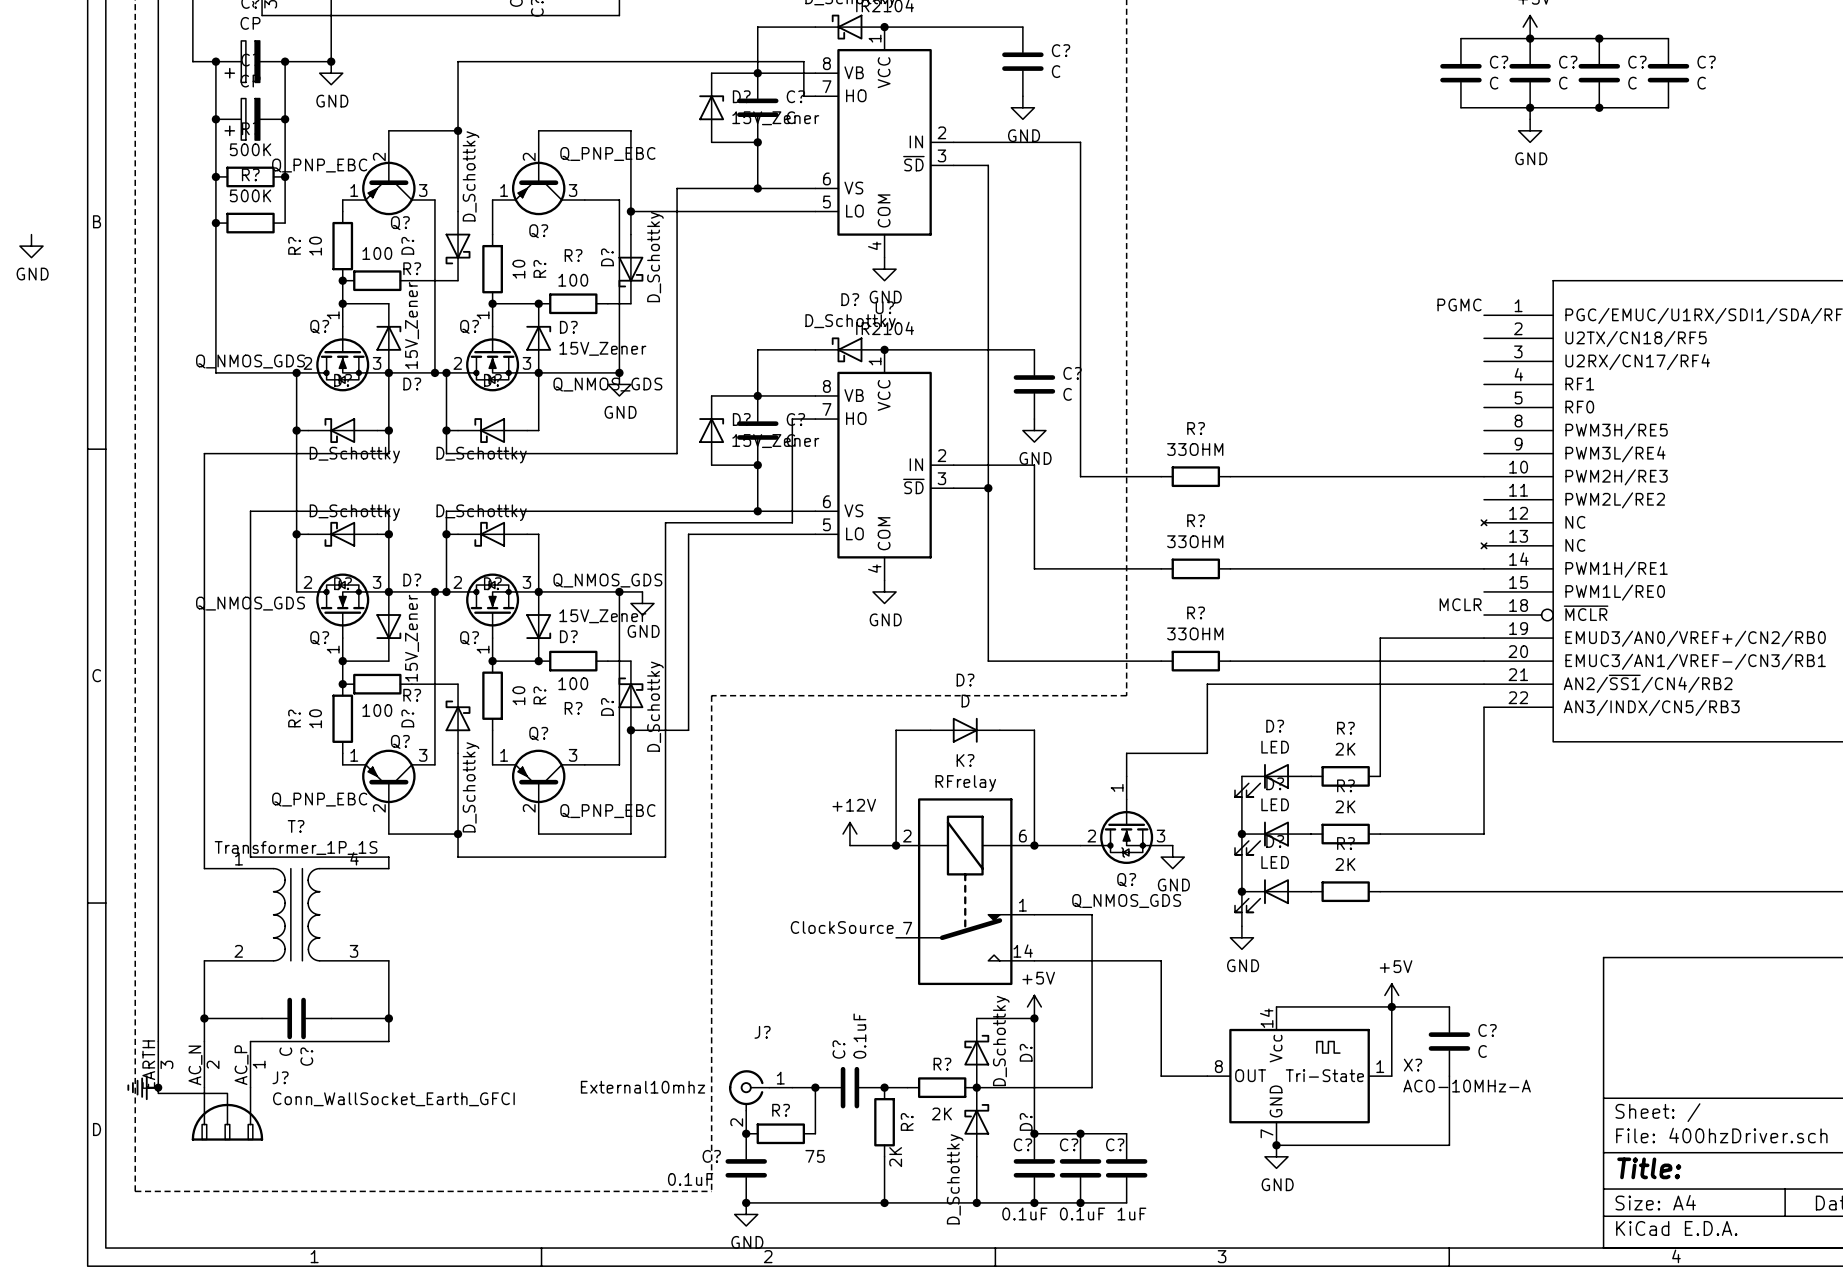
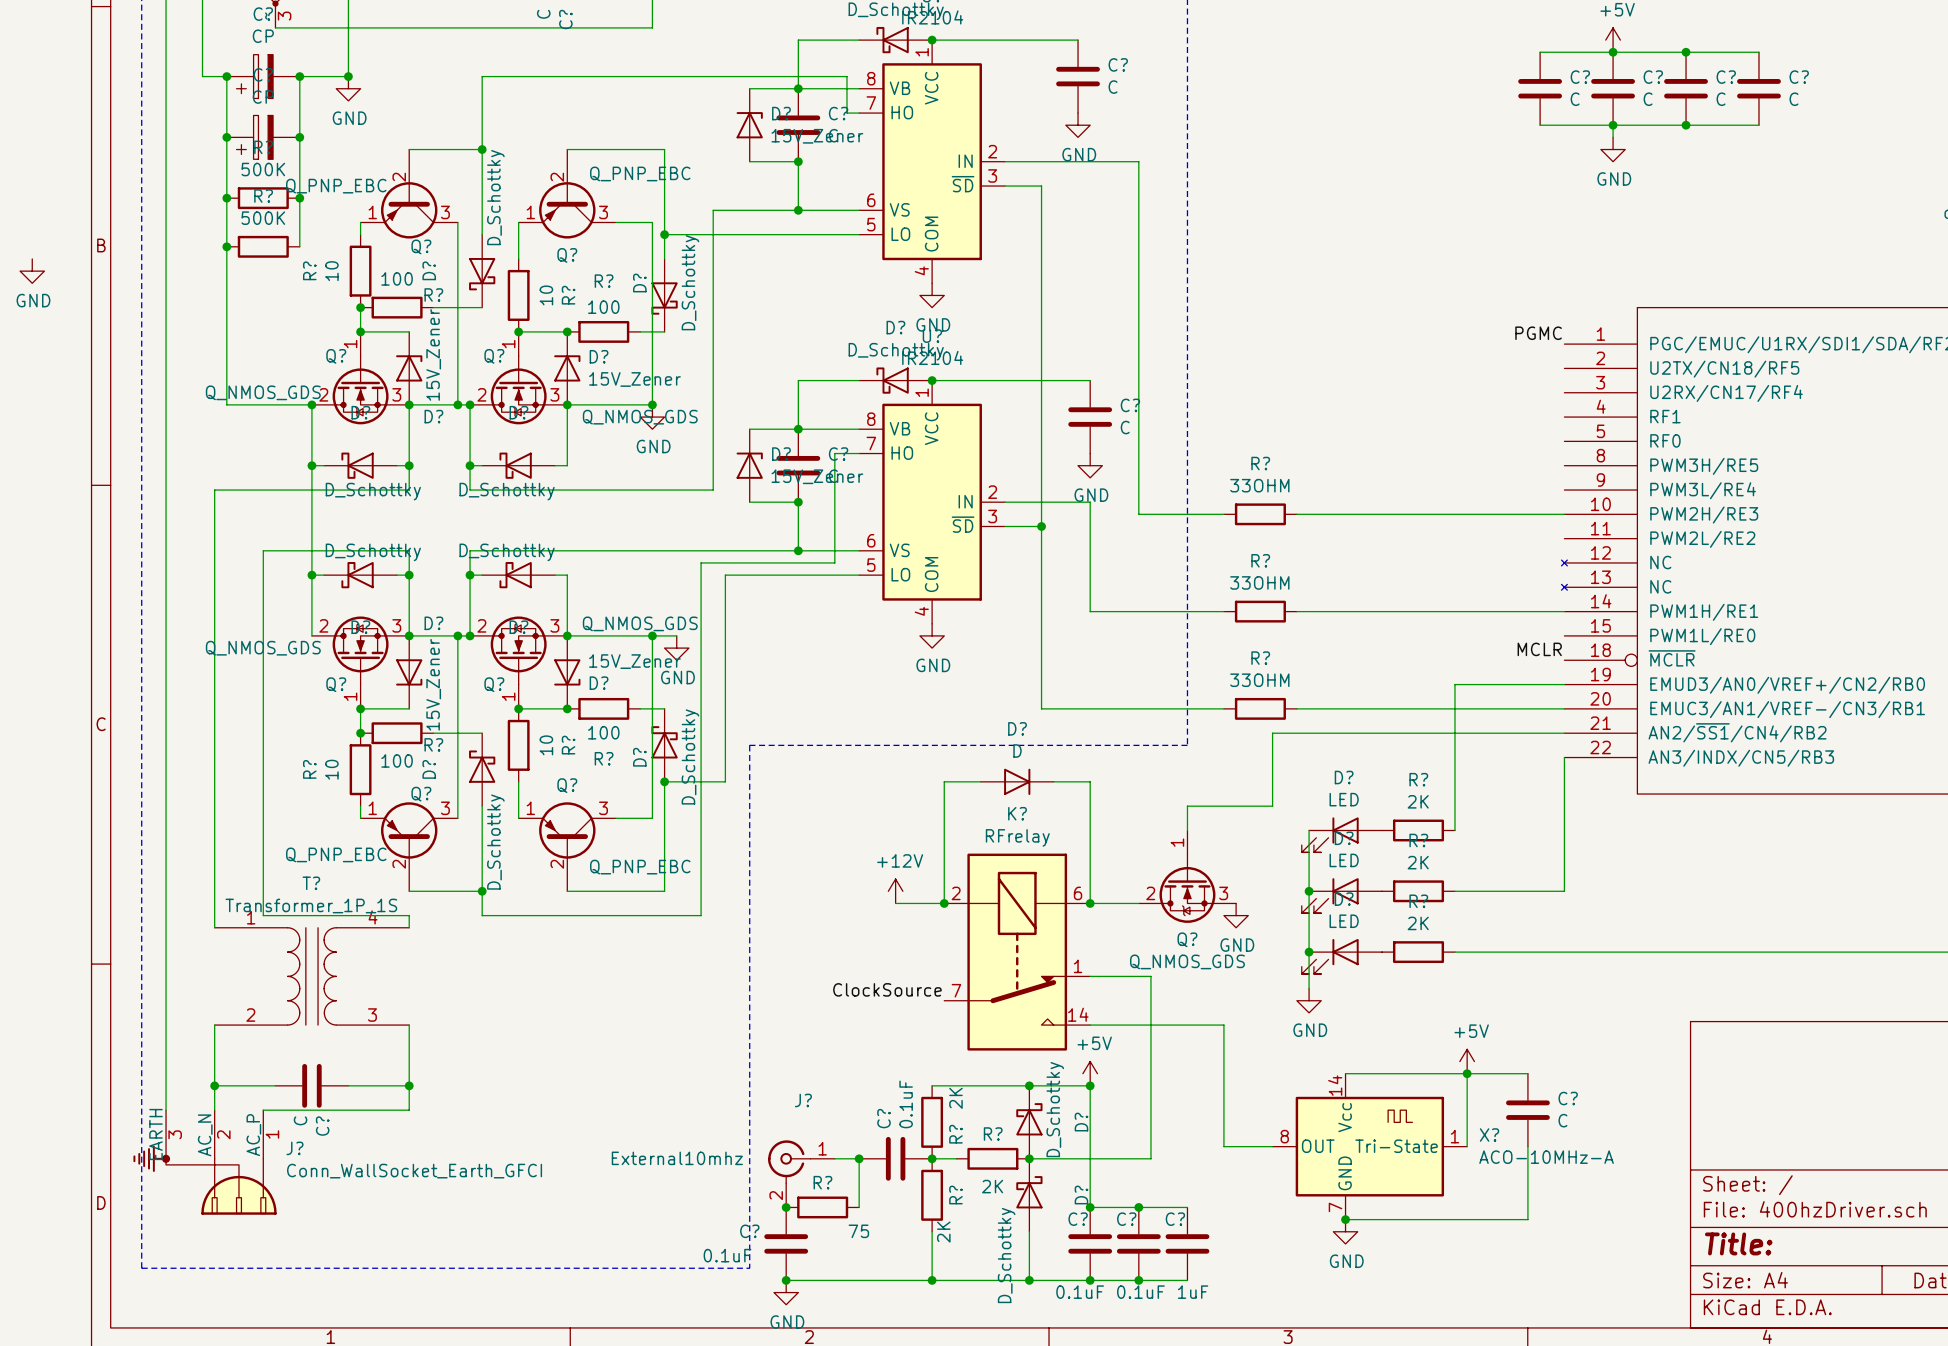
wire: none -> (932, 1085) (1029, 1085)
junction: none -> (1029, 1085)
R?: none -> 2K (932, 1122)

